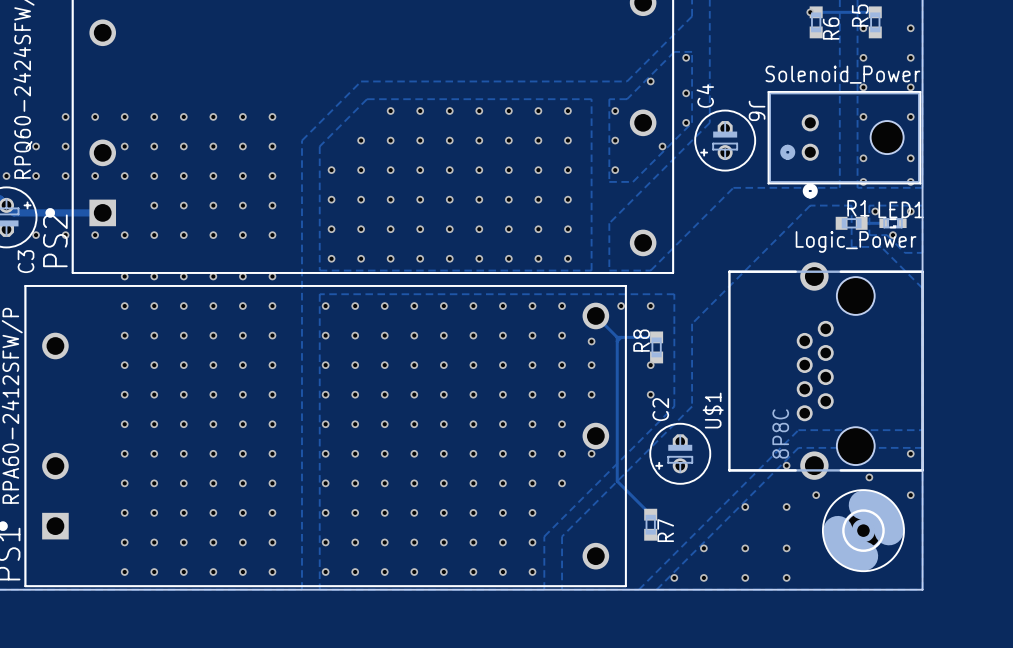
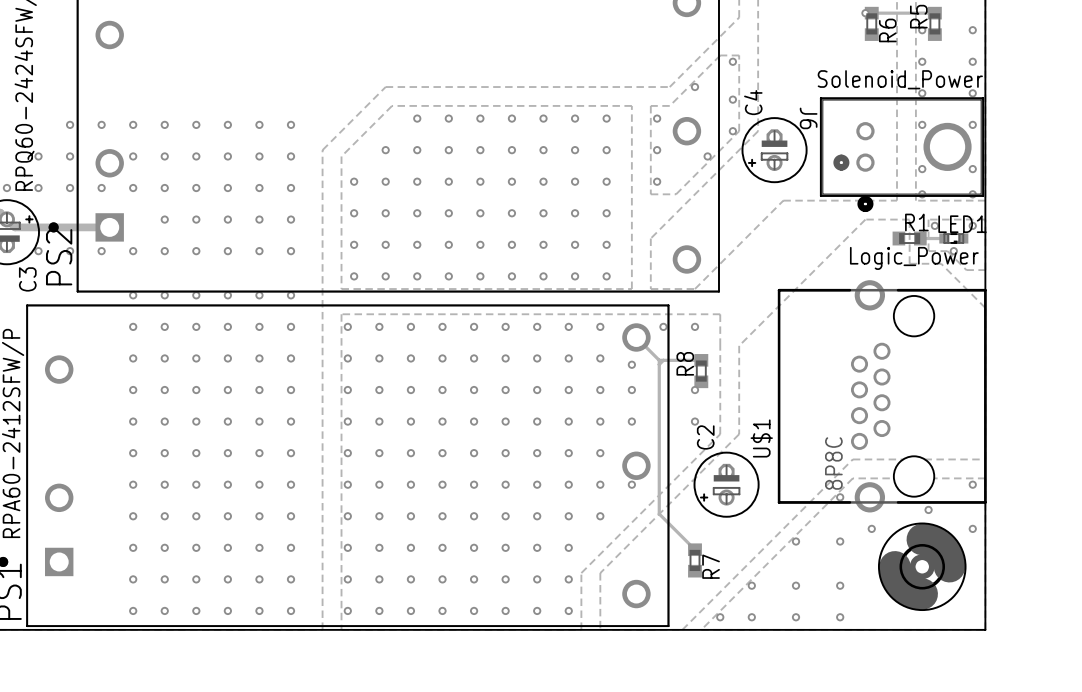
J6 footprint: [767, 91, 922, 199] -> [819, 97, 985, 213]

